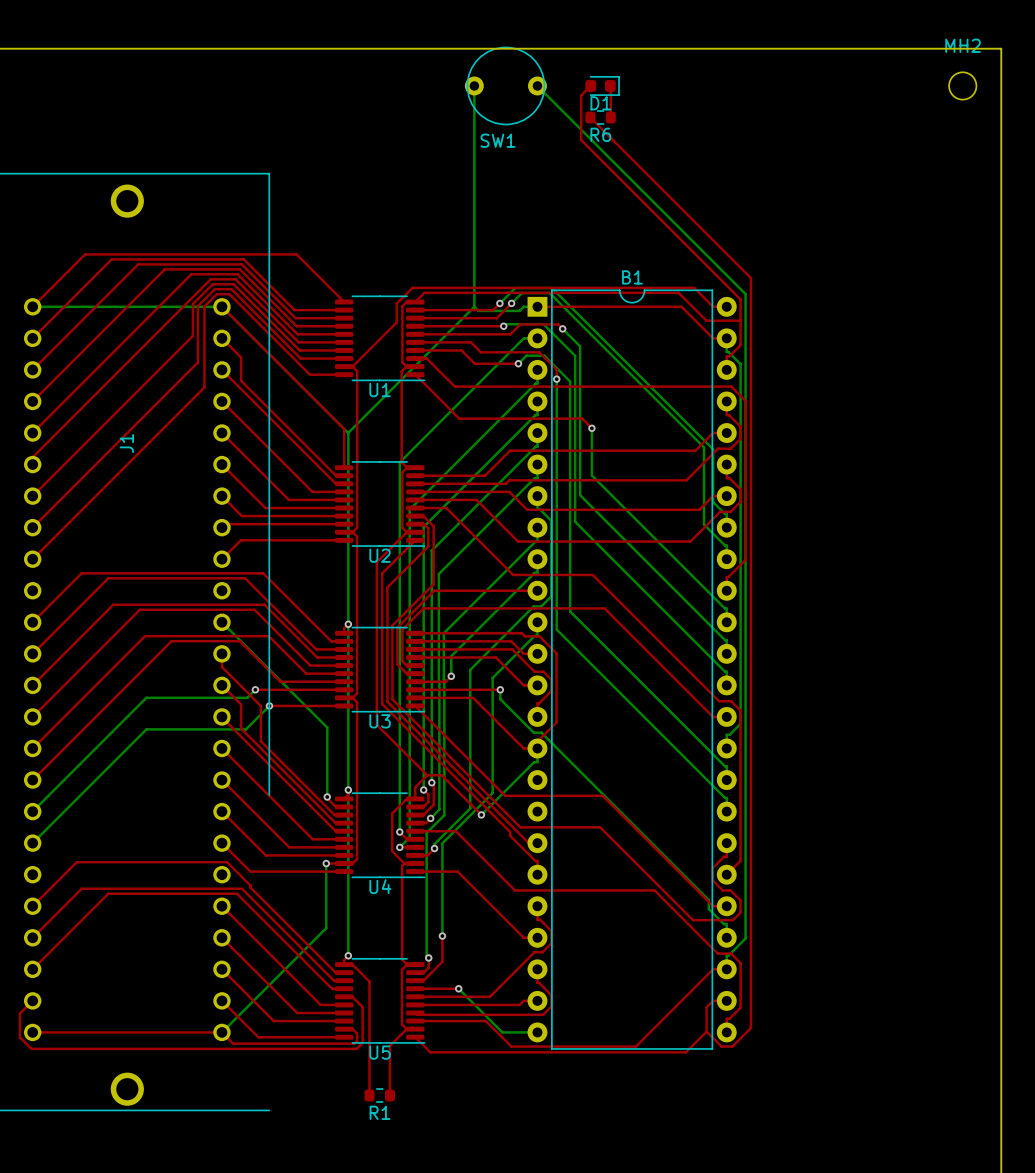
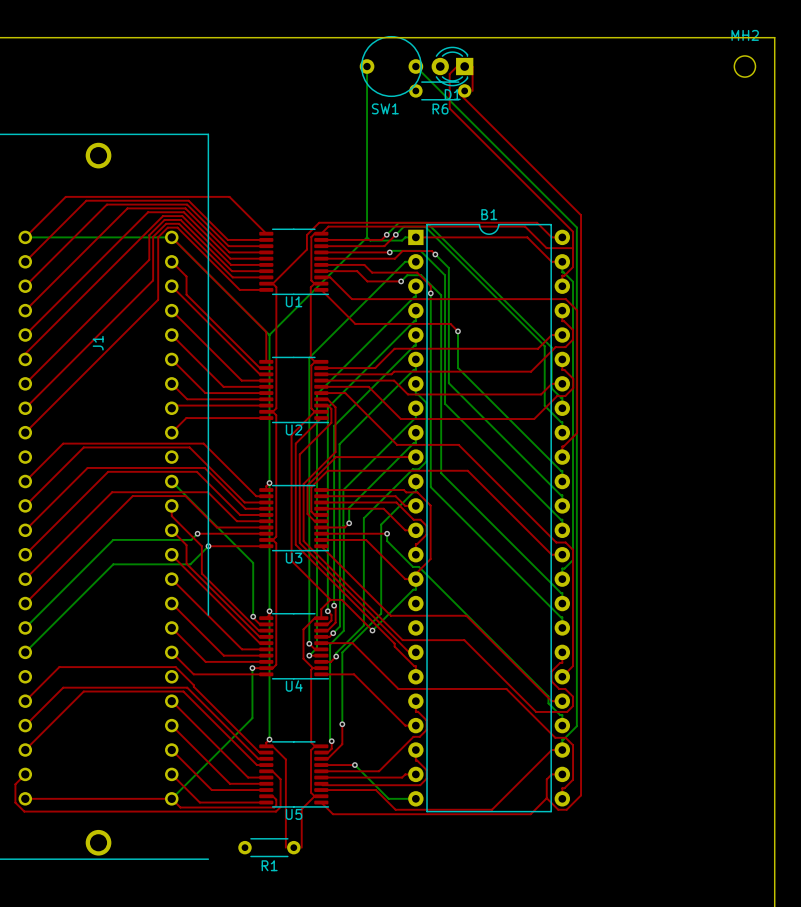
D1 footprint: [585, 76, 620, 96] -> [431, 46, 474, 87]
R6 footprint: [585, 110, 616, 125] -> [409, 81, 472, 101]
R1 footprint: [364, 1088, 395, 1103] -> [238, 838, 301, 858]

